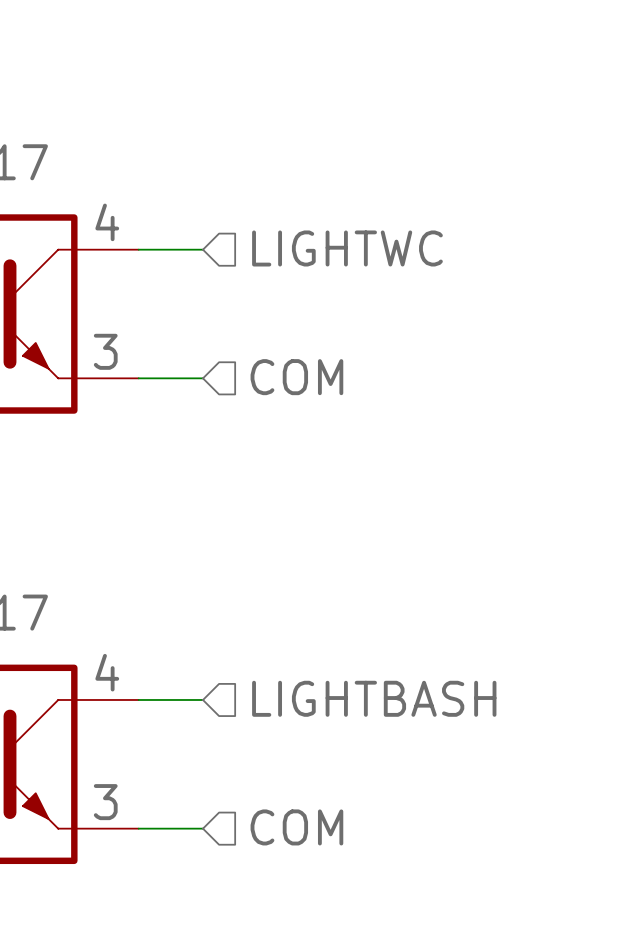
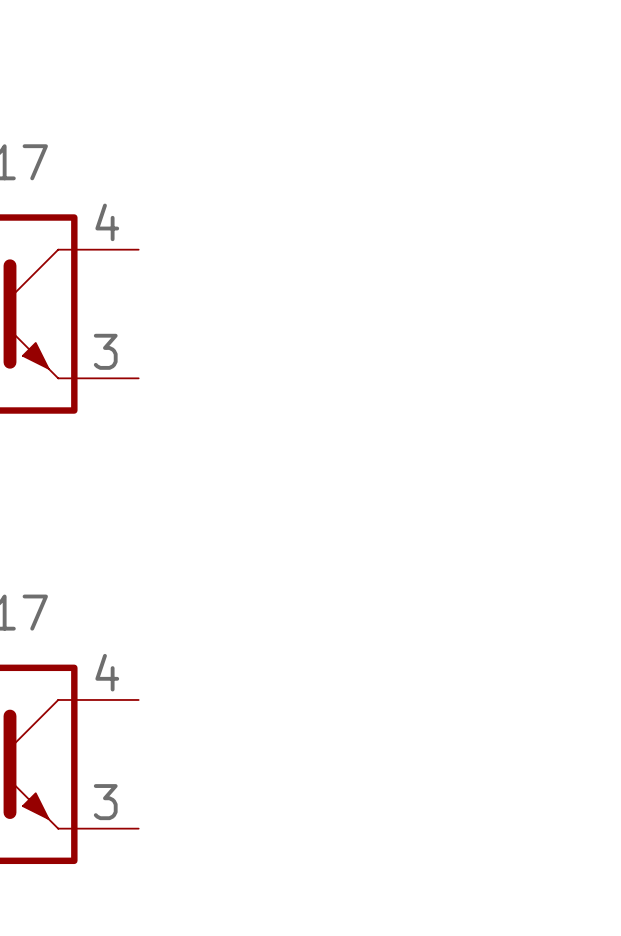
hierarchical label: LIGHTWC (347, 248) -> none
wire: (138, 249) (202, 249) -> none
hierarchical label: COM (296, 377) -> none
wire: (138, 378) (202, 378) -> none
hierarchical label: LIGHTBASH (374, 698) -> none
wire: (138, 699) (202, 699) -> none
hierarchical label: COM (296, 827) -> none
wire: (138, 828) (202, 828) -> none

